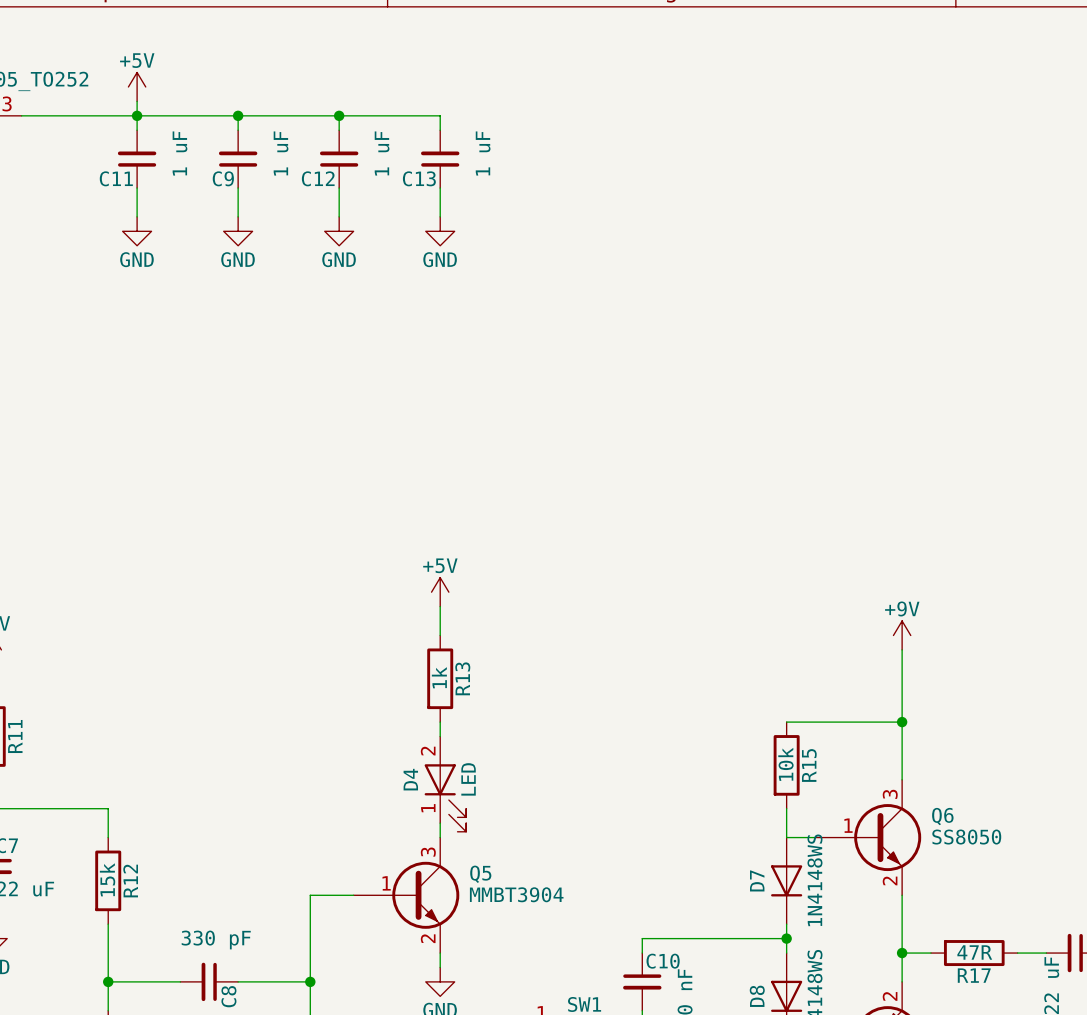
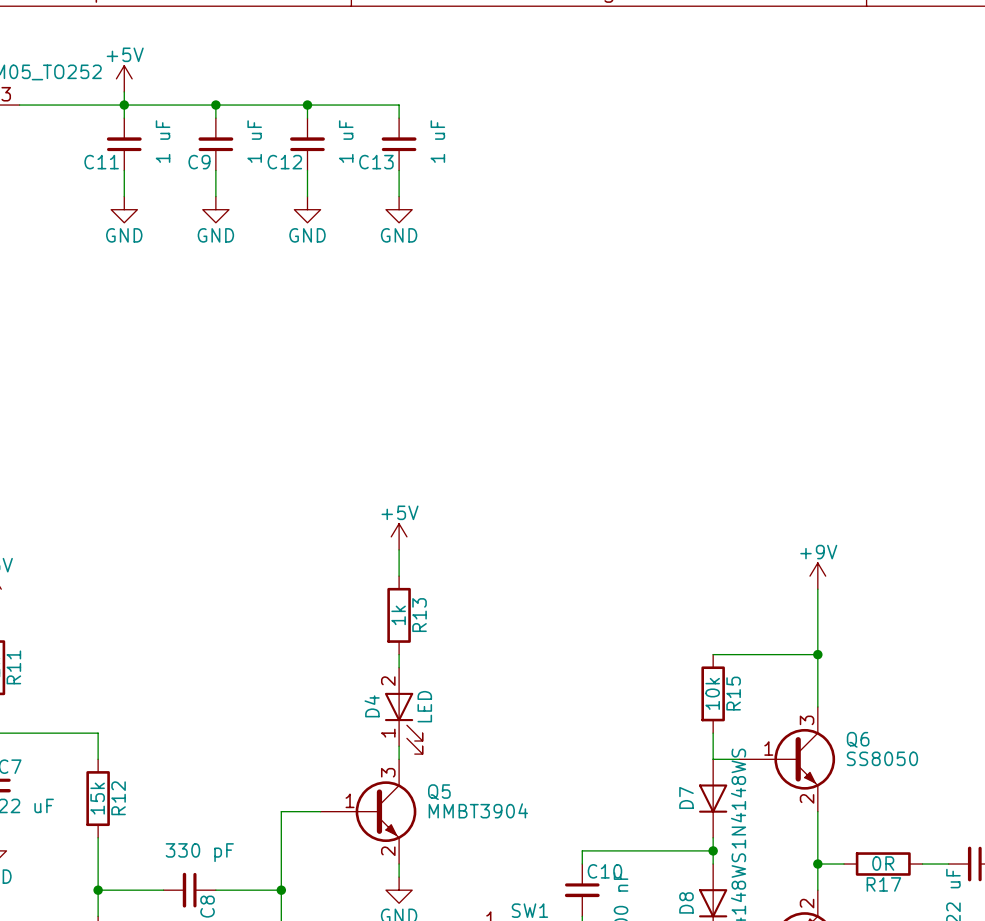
R17 value: 47R (974, 952) -> 0R (883, 863)

